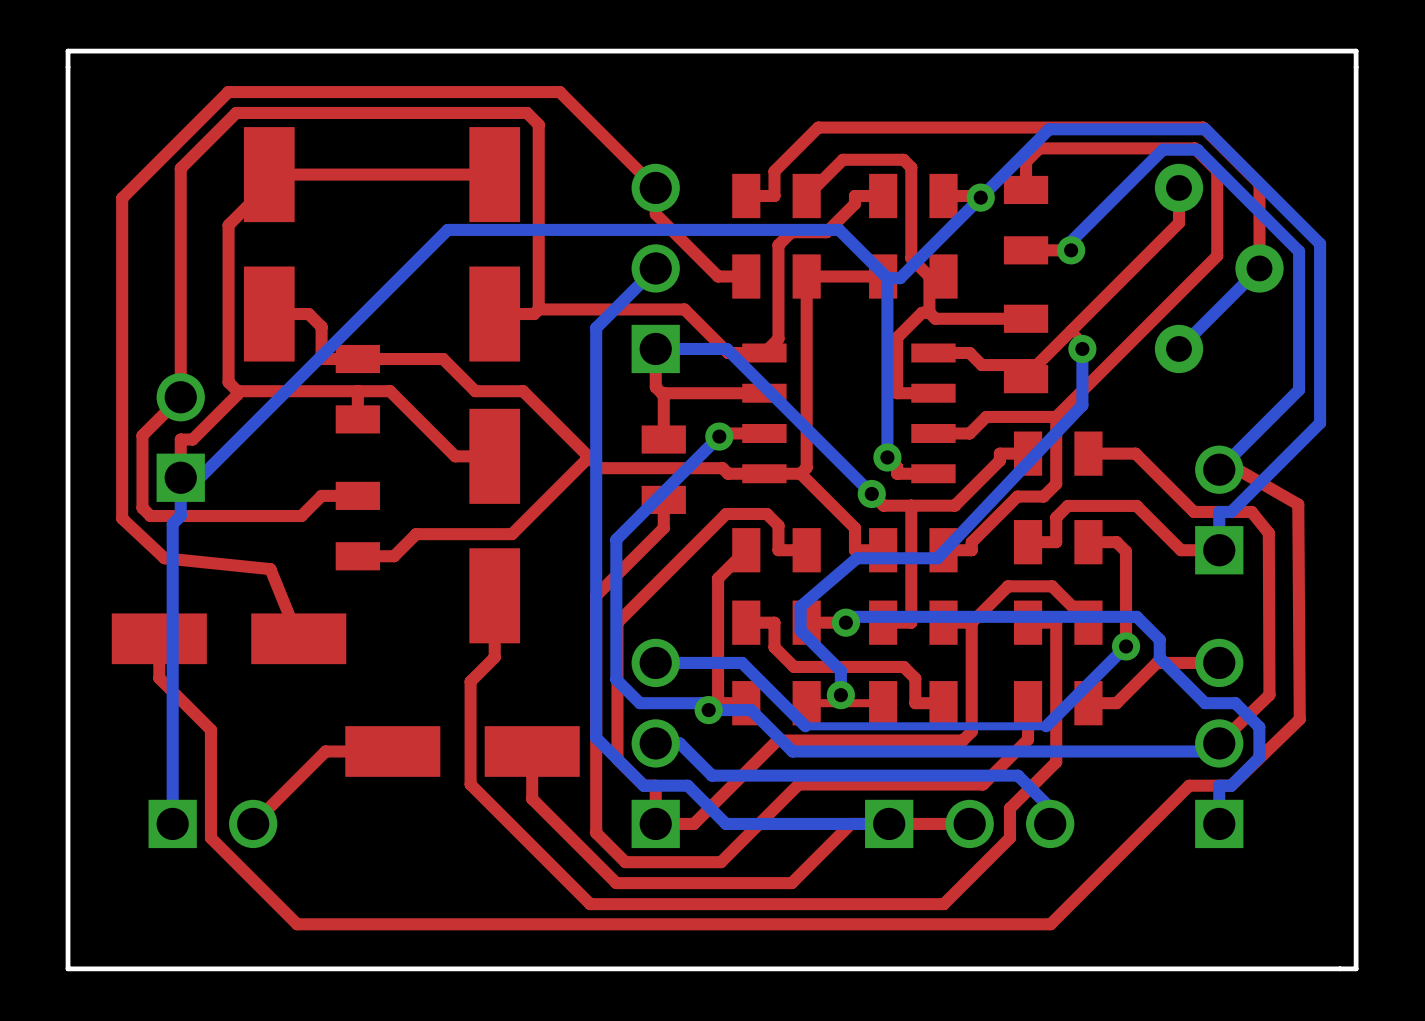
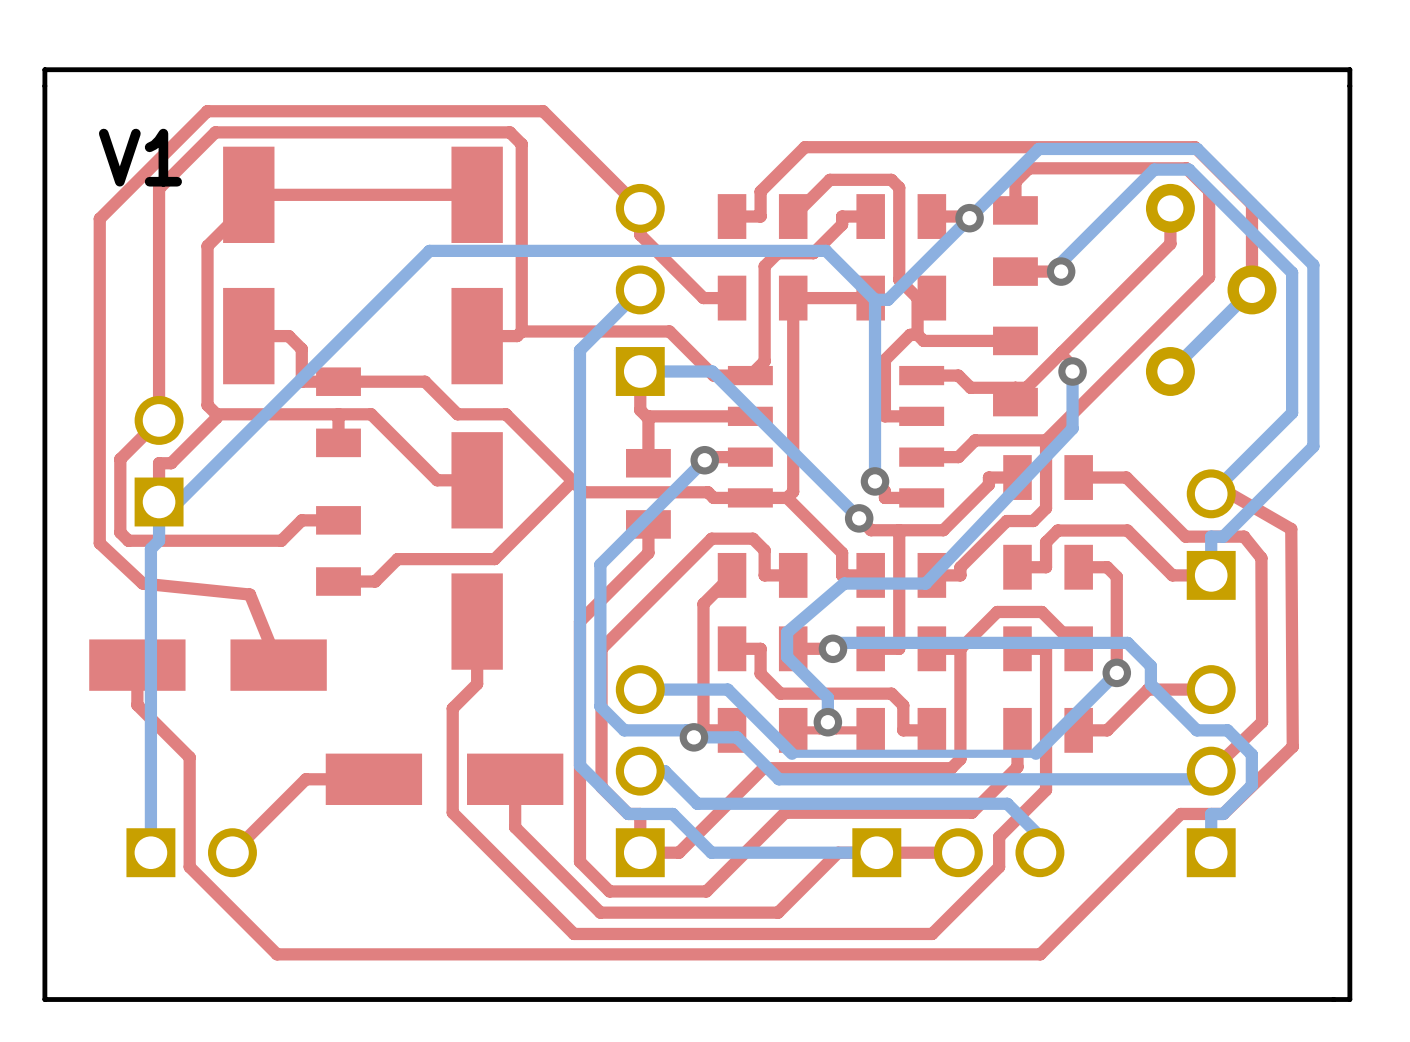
text: none -> V1 (140, 157)

